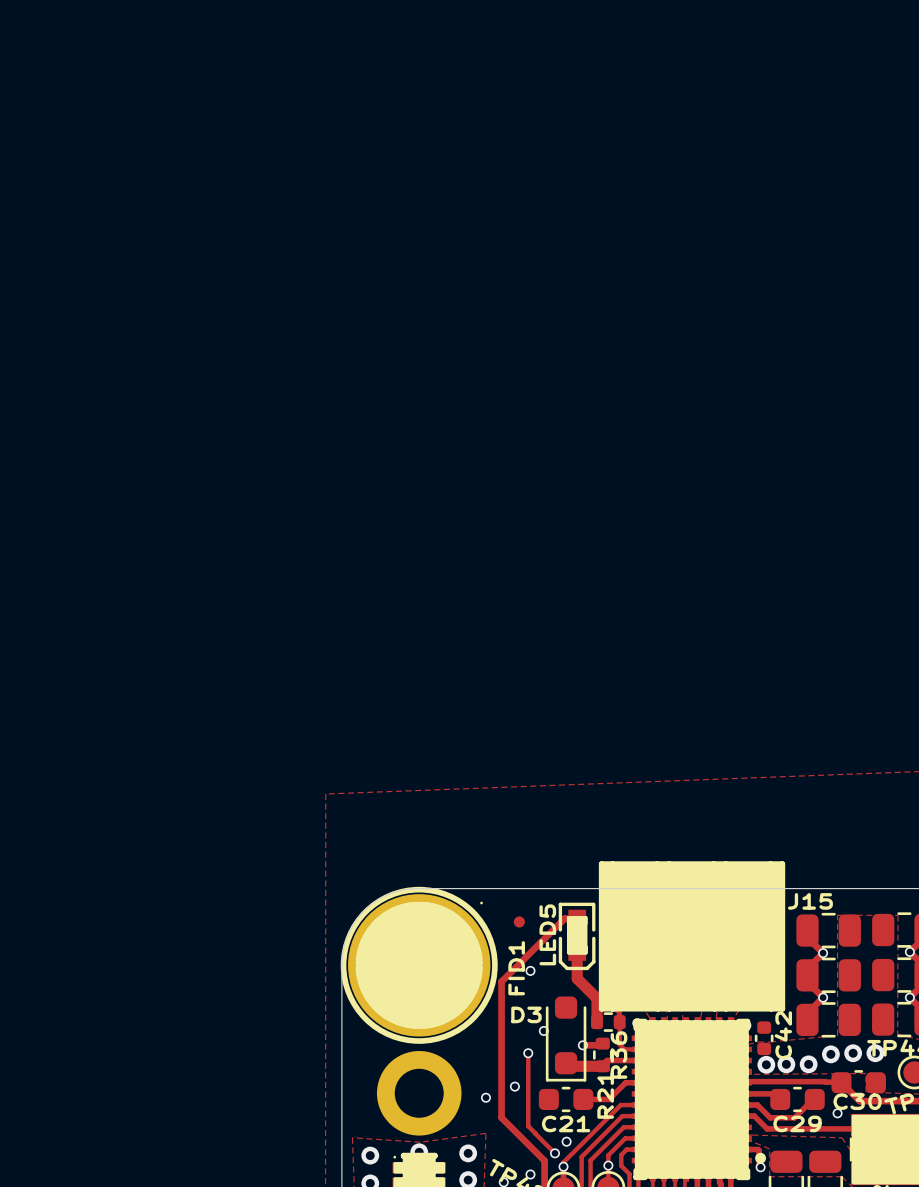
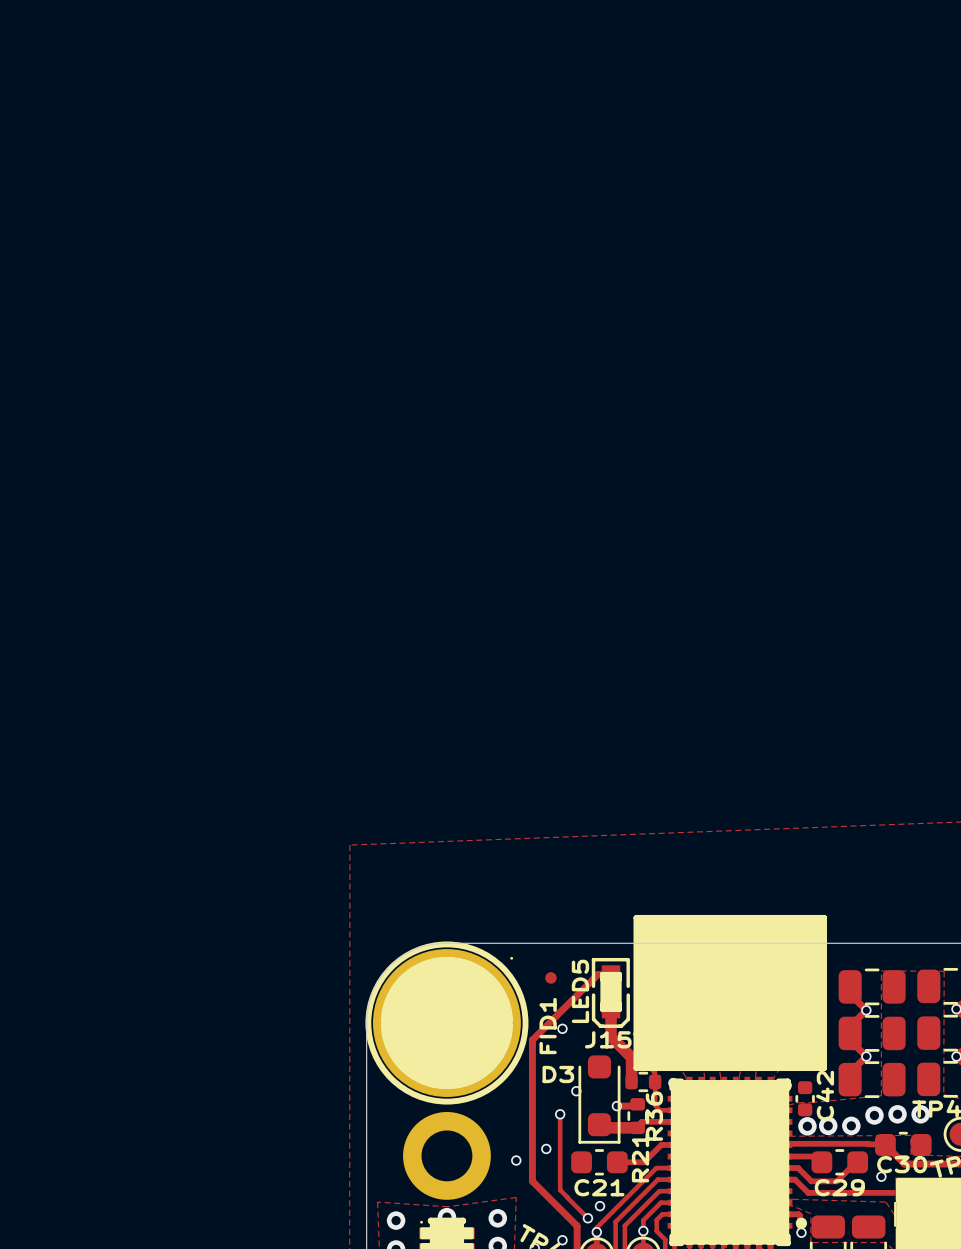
J15 name position: J15 (810, 901) -> J15 (608, 1039)

